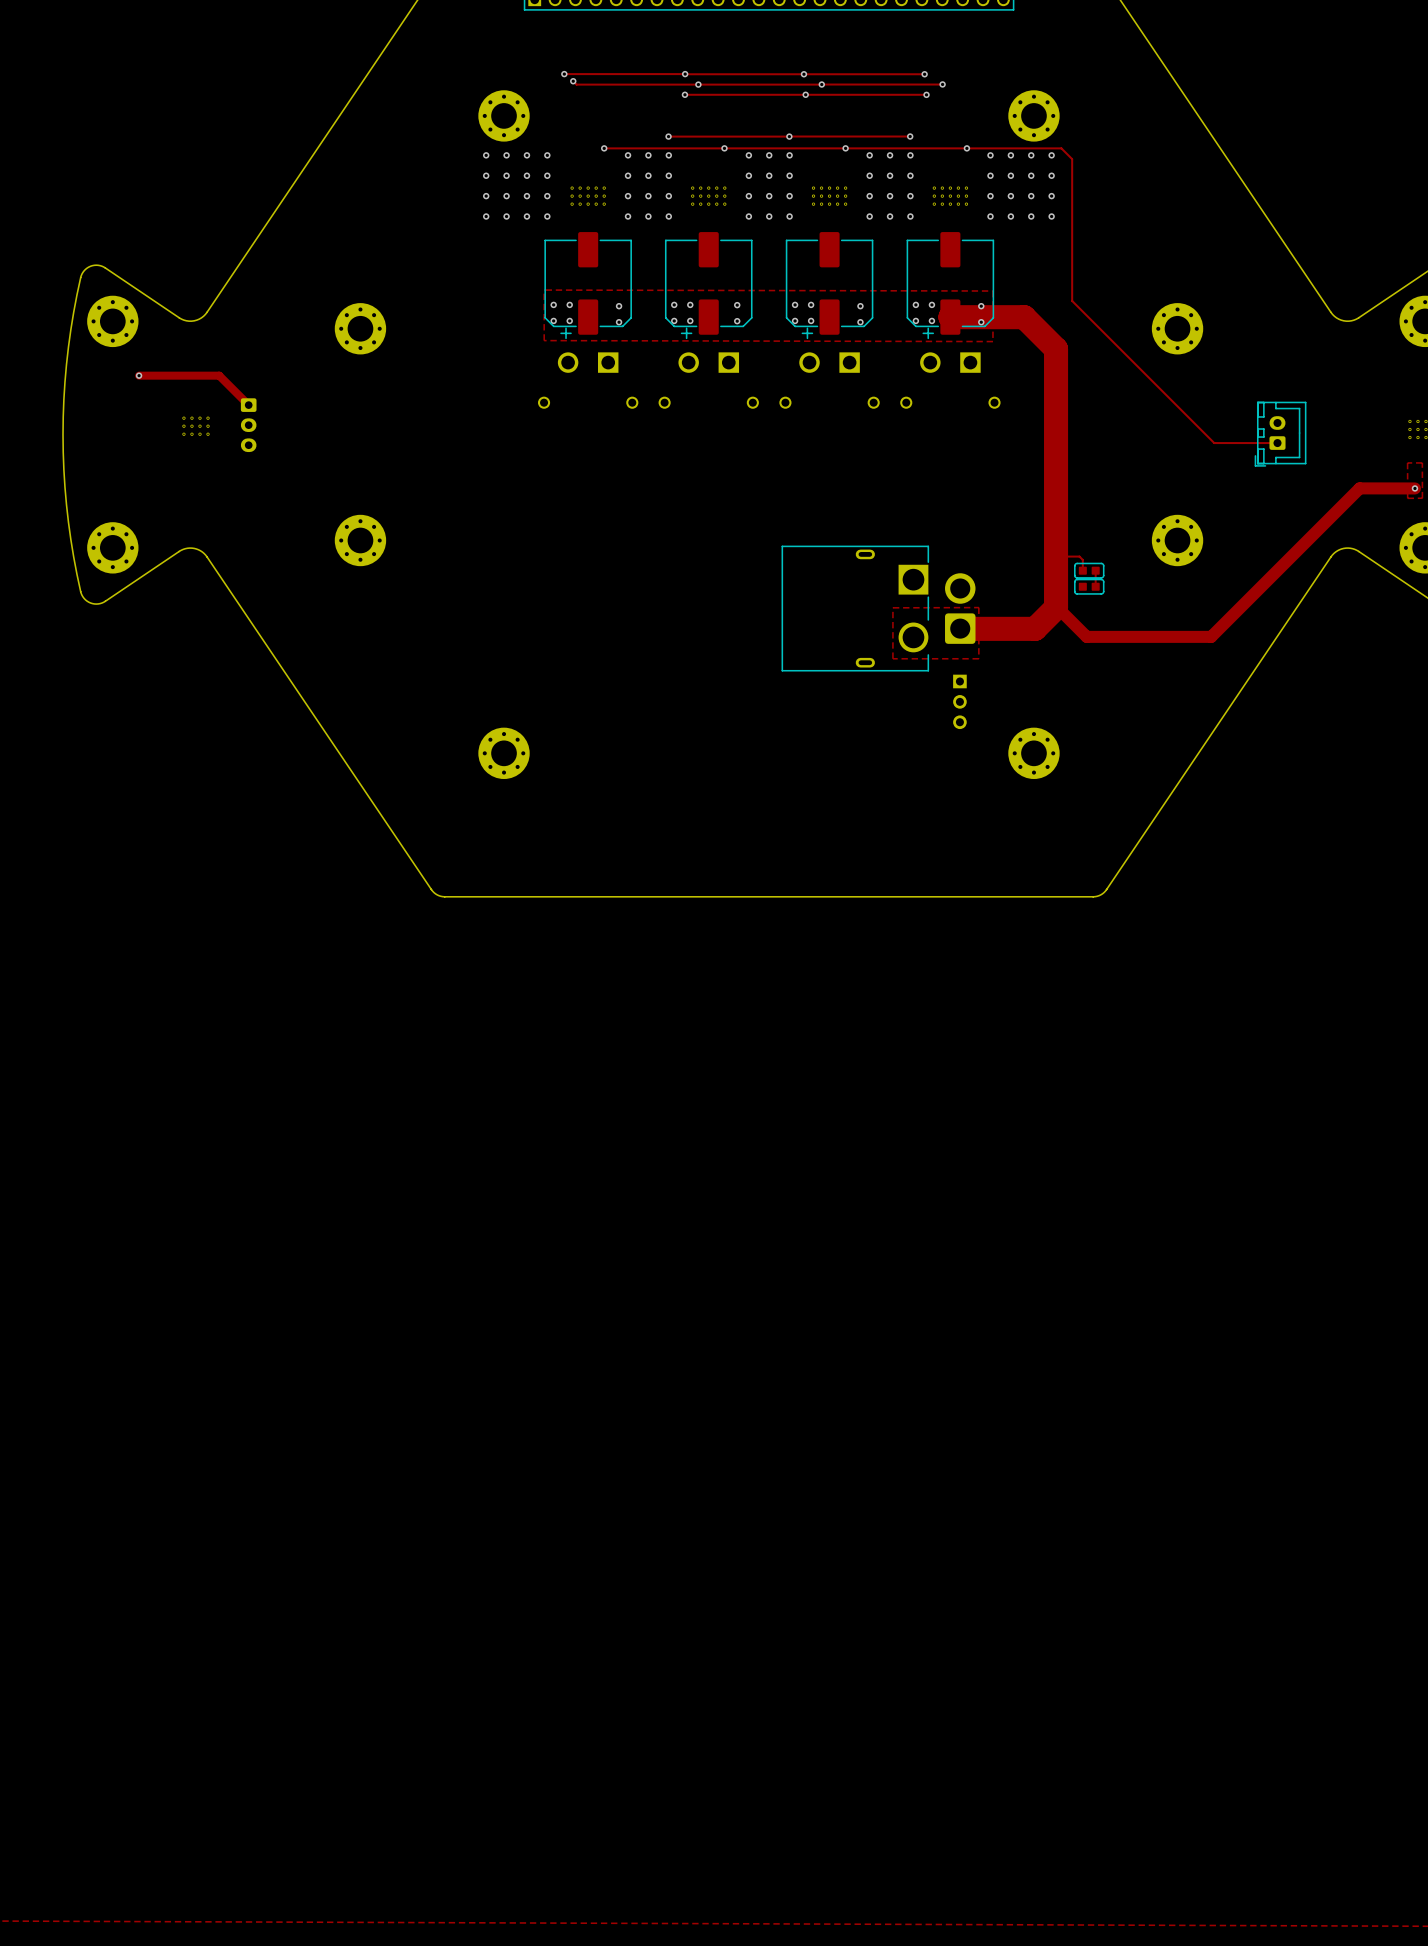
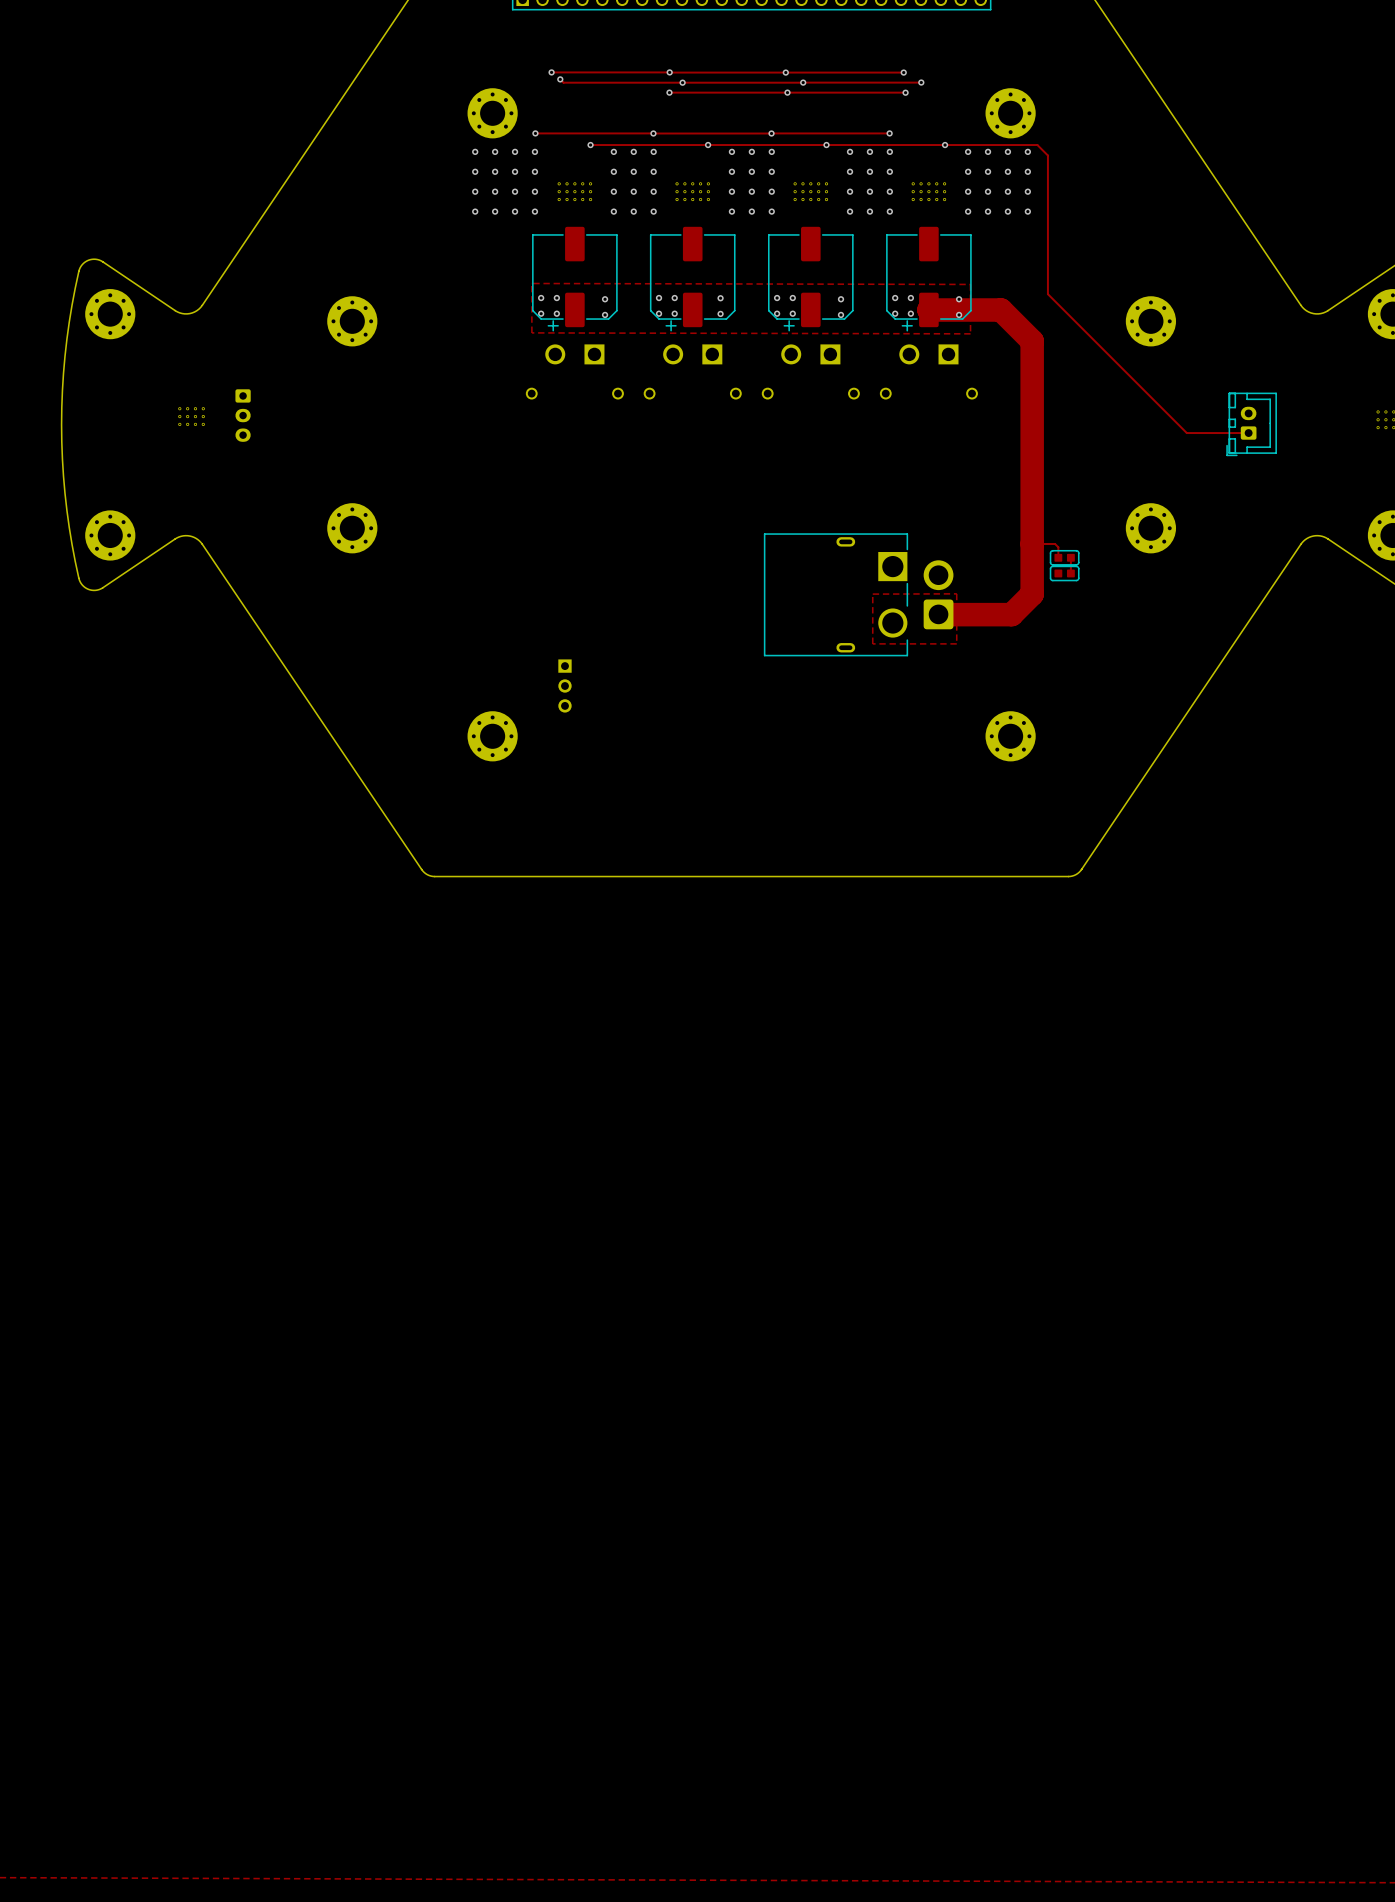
track: none -> (535, 133) (653, 133)
via: none -> (535, 133)
track: (139, 375) (219, 375) (248, 405) -> none
via: (139, 375) -> none
zone outline: (1407, 462) (1407, 498) (1422, 498) (1422, 462) (1407, 462) -> none
track: (1414, 488) (1359, 488) (1211, 636) (1086, 636) (1056, 607) -> none
via: (1414, 488) -> none
part: none -> (564, 686)
part: (959, 701) -> none

